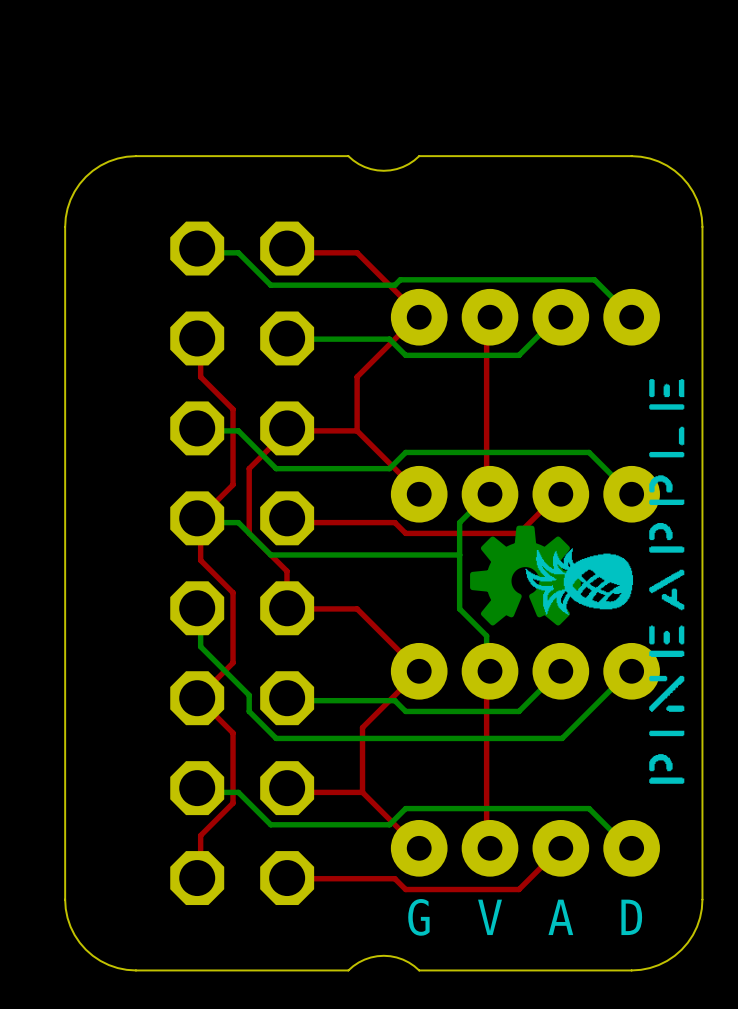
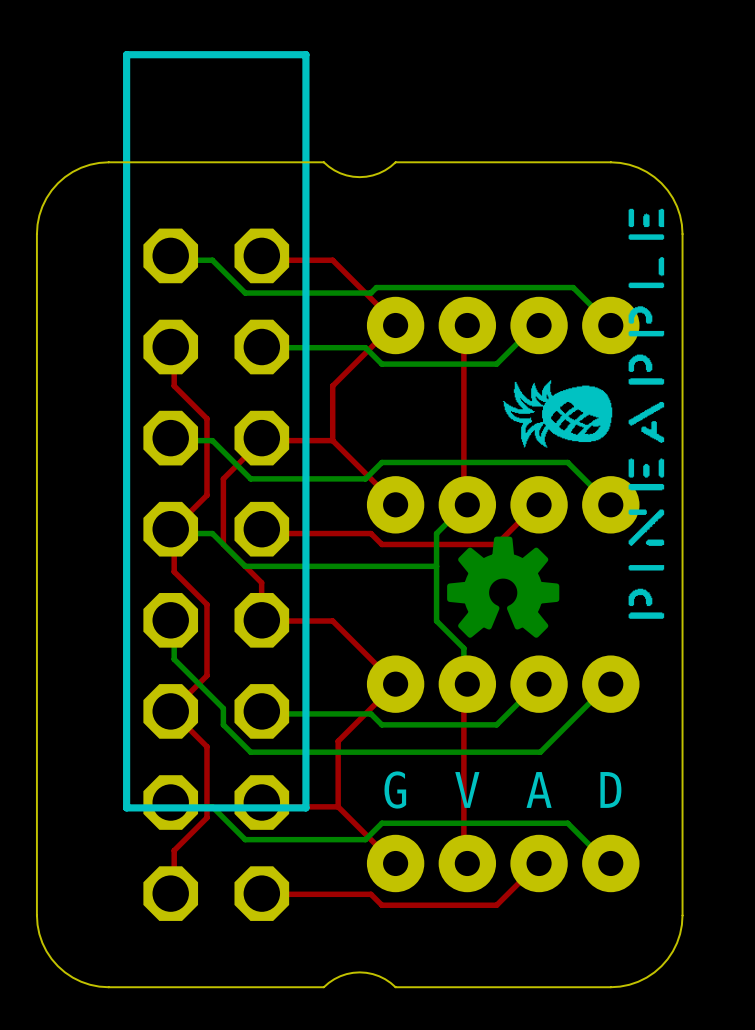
line: none -> (305, 54) (126, 54) (126, 807) (305, 807) (305, 54)
drawing position: (604, 581) -> (583, 413)
text position: G (418, 917) -> G (395, 789)
text position: V (490, 917) -> V (467, 789)
text position: A (560, 917) -> A (539, 789)
text position: D (631, 917) -> D (610, 789)

